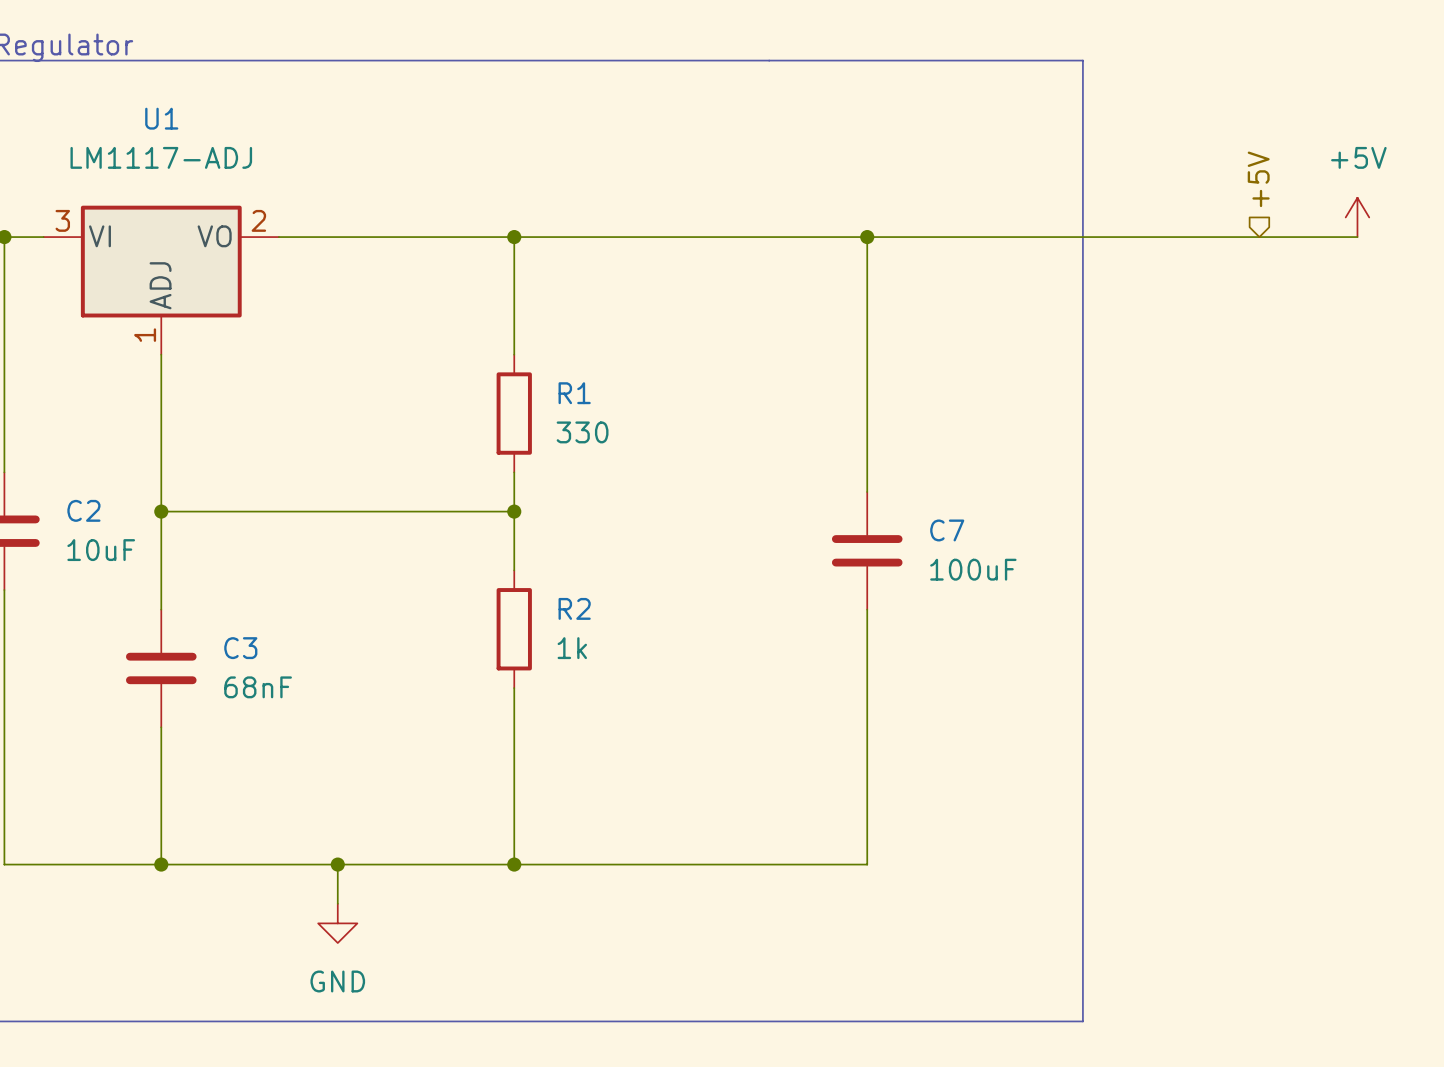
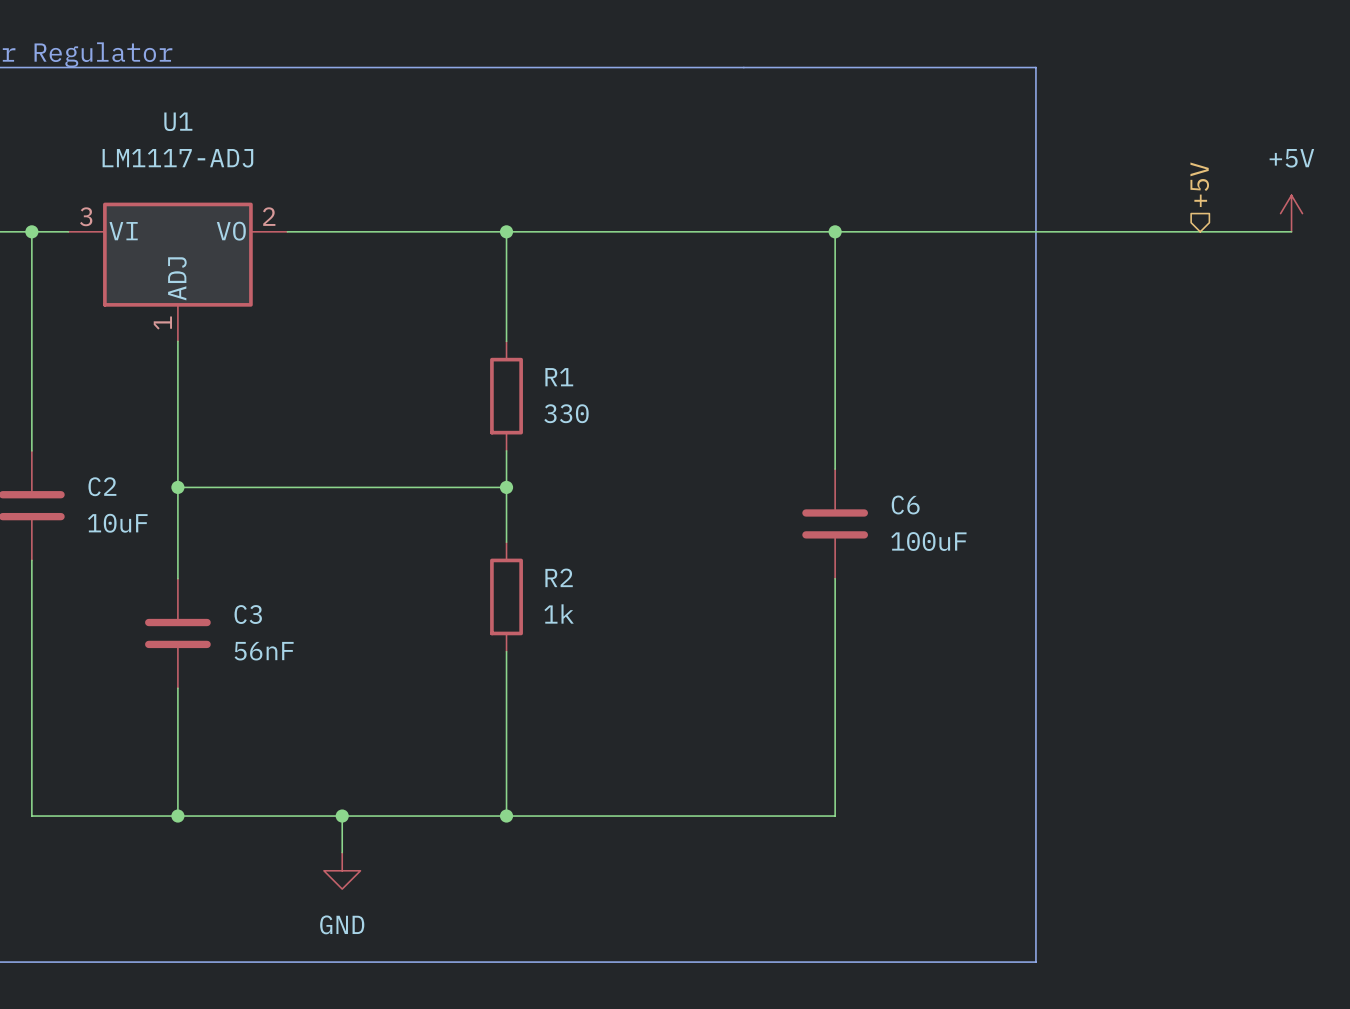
C7 name: C7 (947, 530) -> C6 (905, 504)
C3 value: 68nF (258, 687) -> 56nF (264, 651)

